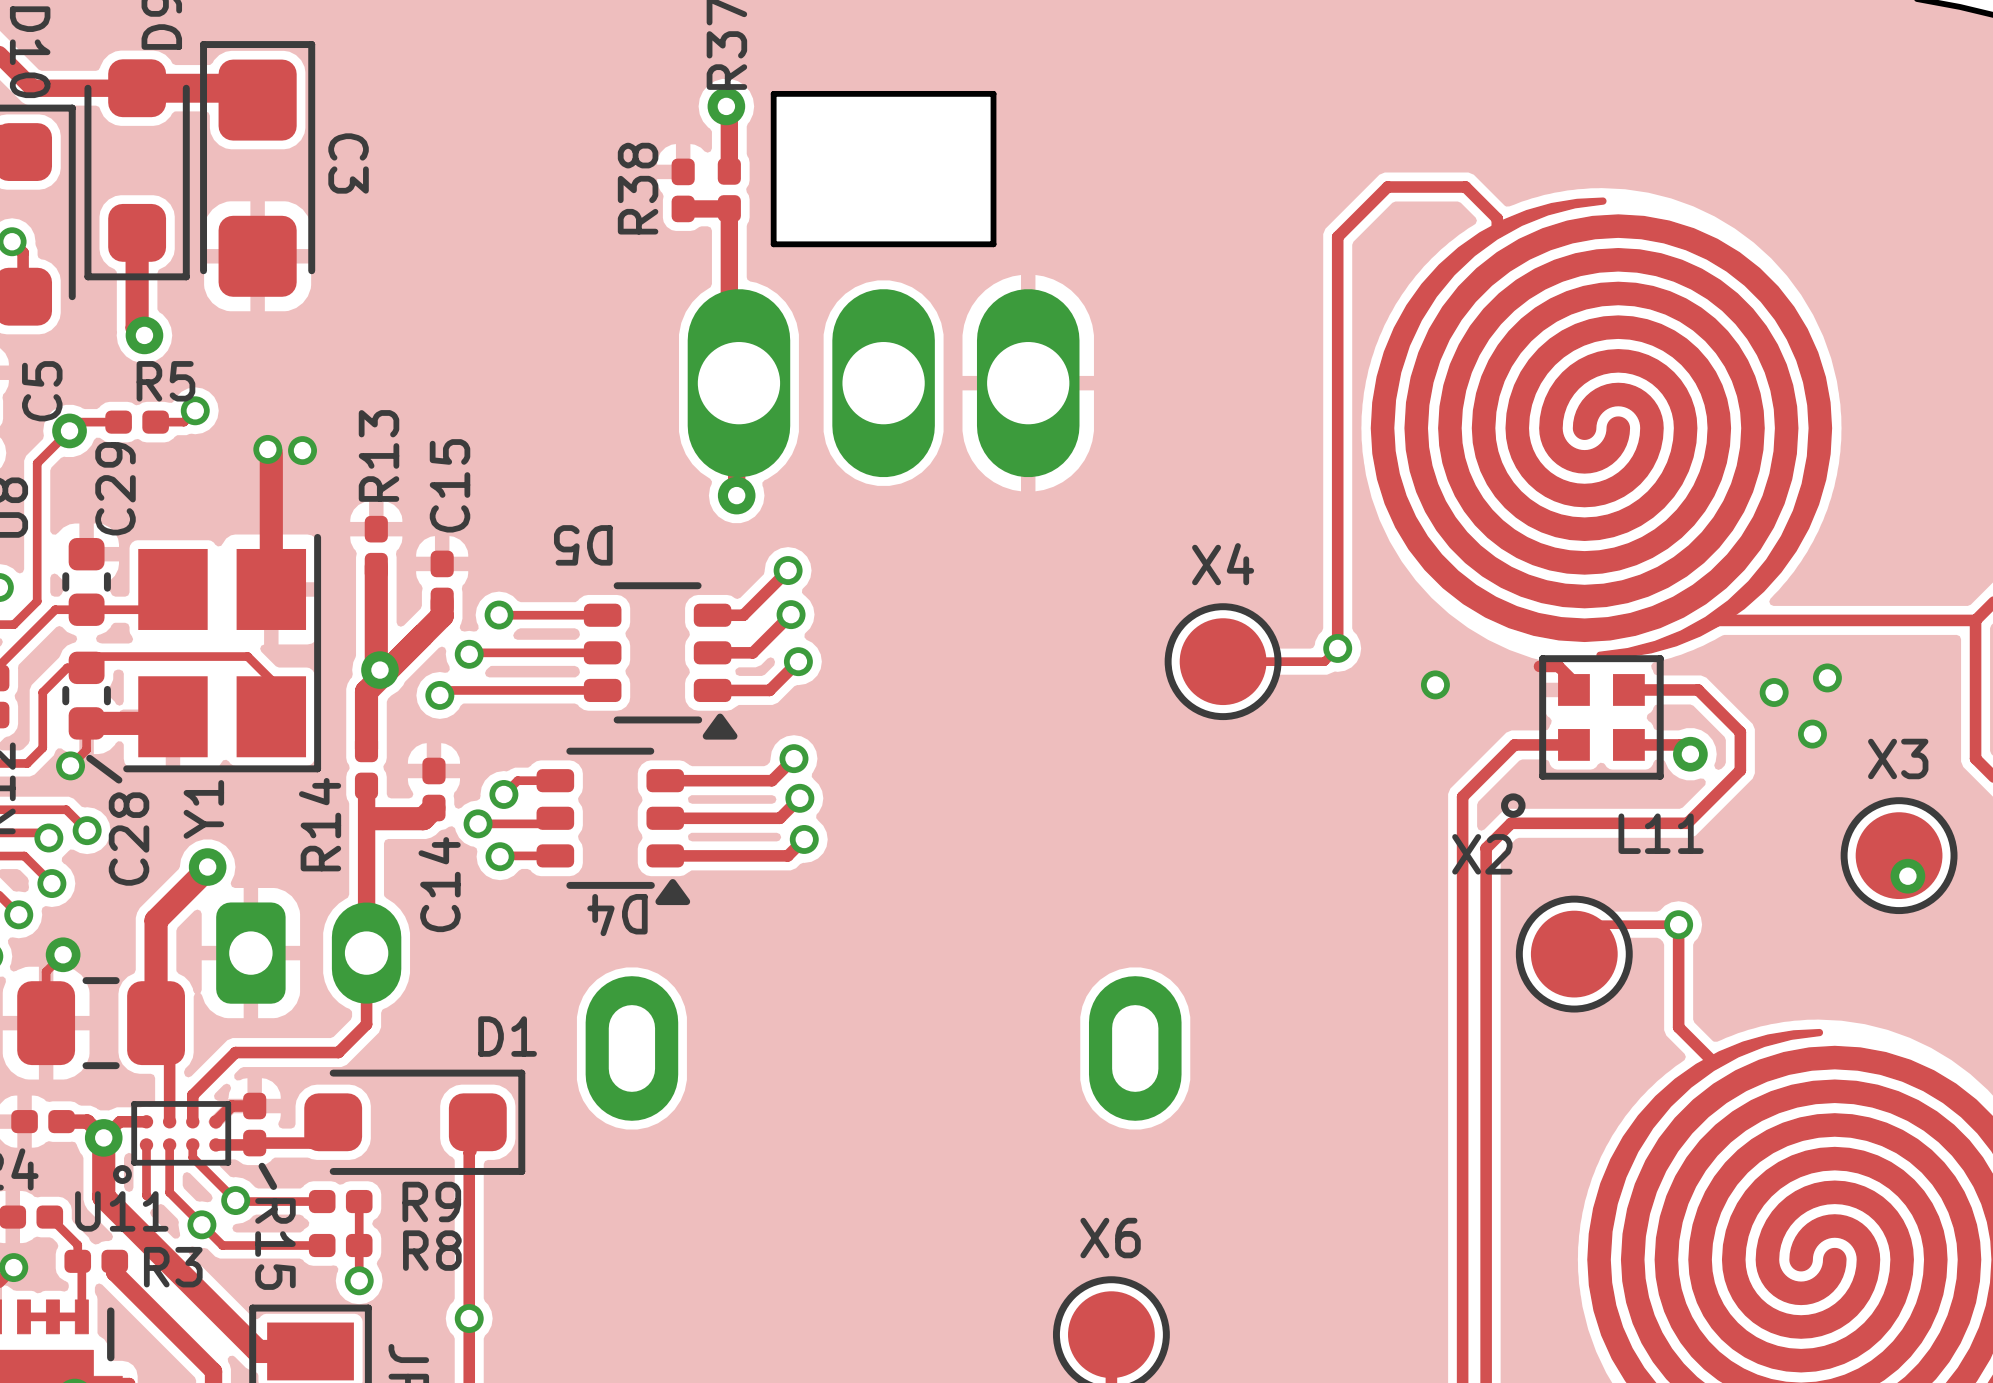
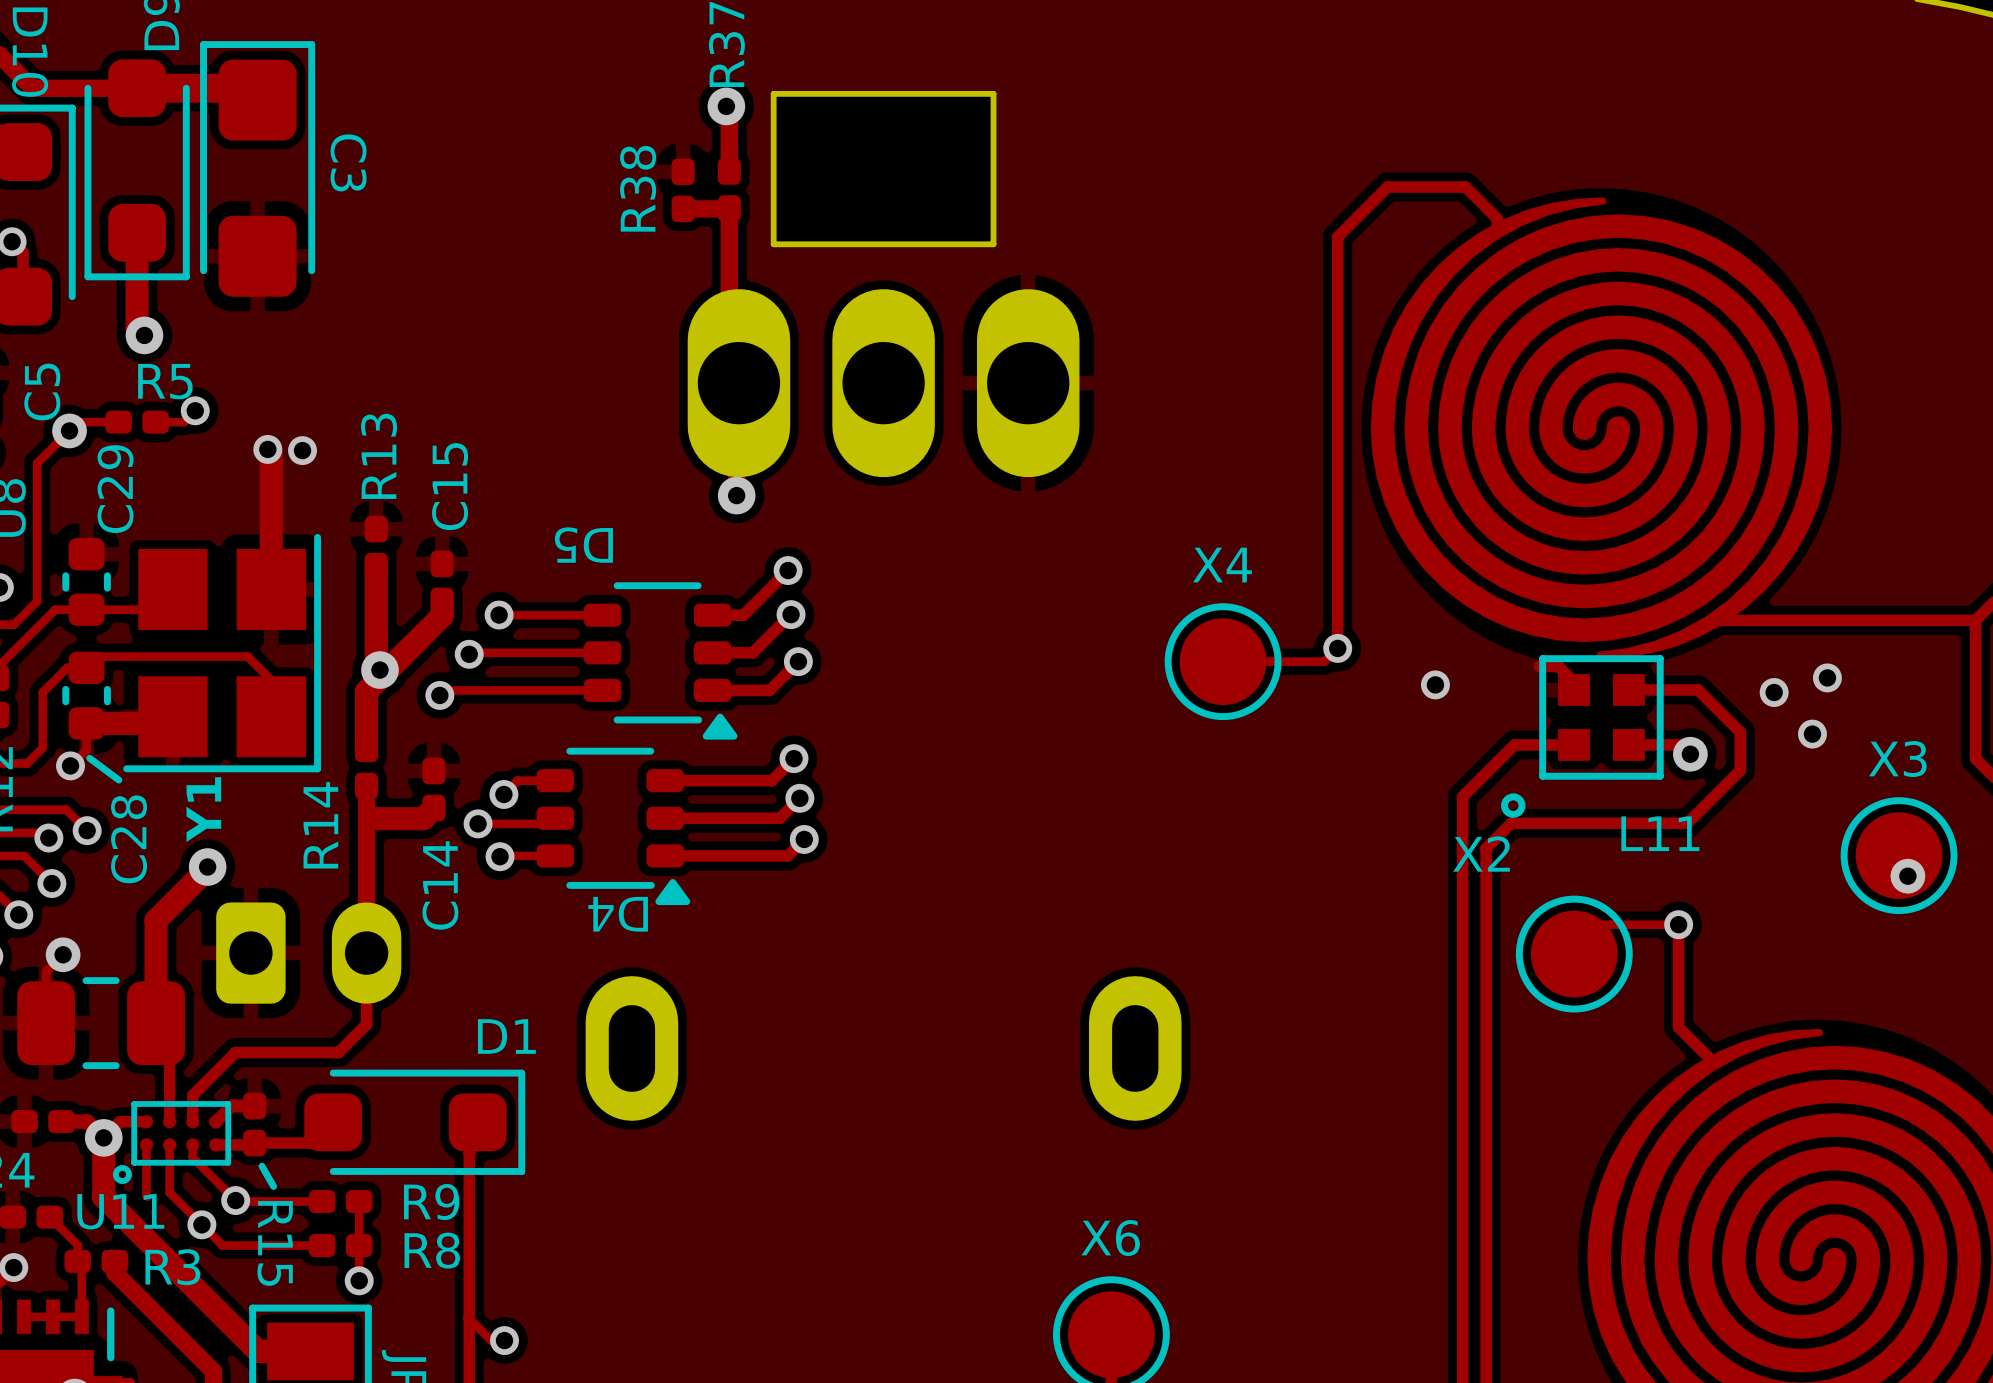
track: none -> (469, 1318) (491, 1340) (504, 1340)
via position: (469, 1318) -> (504, 1340)

